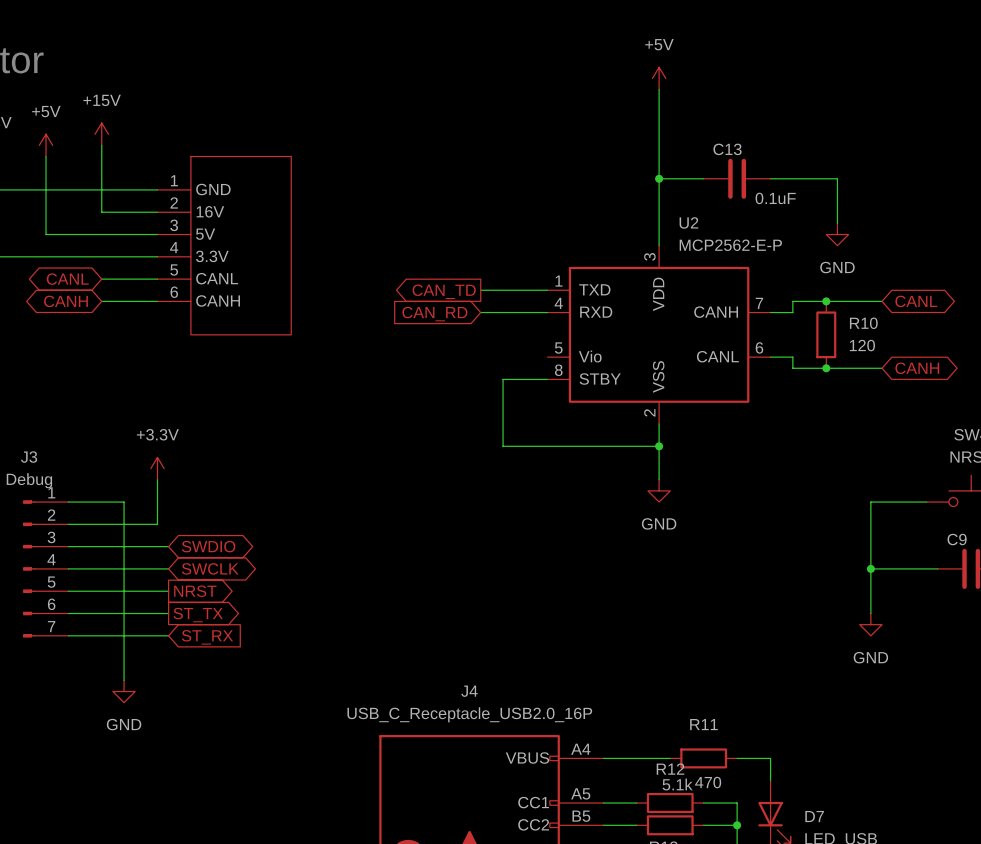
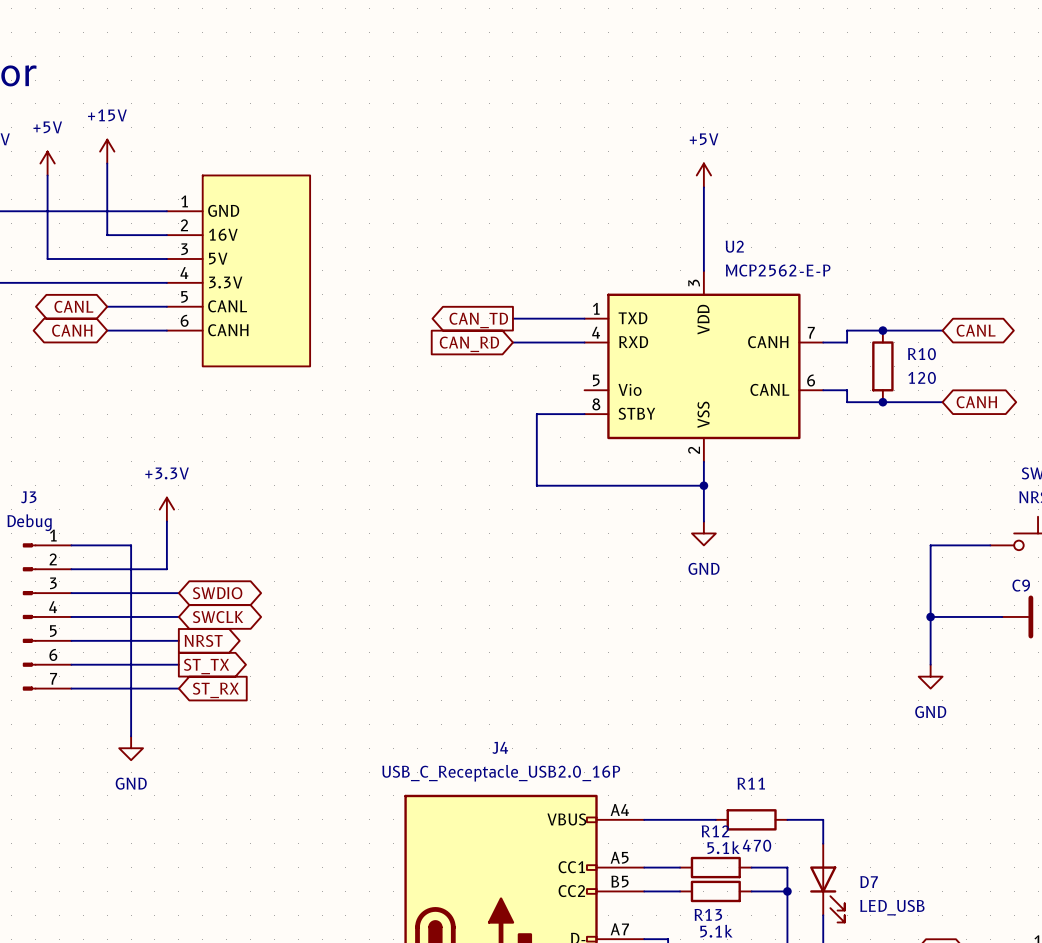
power symbol position: +5V (659, 78) -> +5V (703, 175)
wire: (659, 89) (659, 167) -> none
wire: (659, 178) (703, 178) -> none
junction: (659, 178) -> none
C13: 0.1uF (737, 178) -> none
wire: (770, 178) (837, 178) (837, 223) -> none
power symbol: GND (837, 234) -> none

